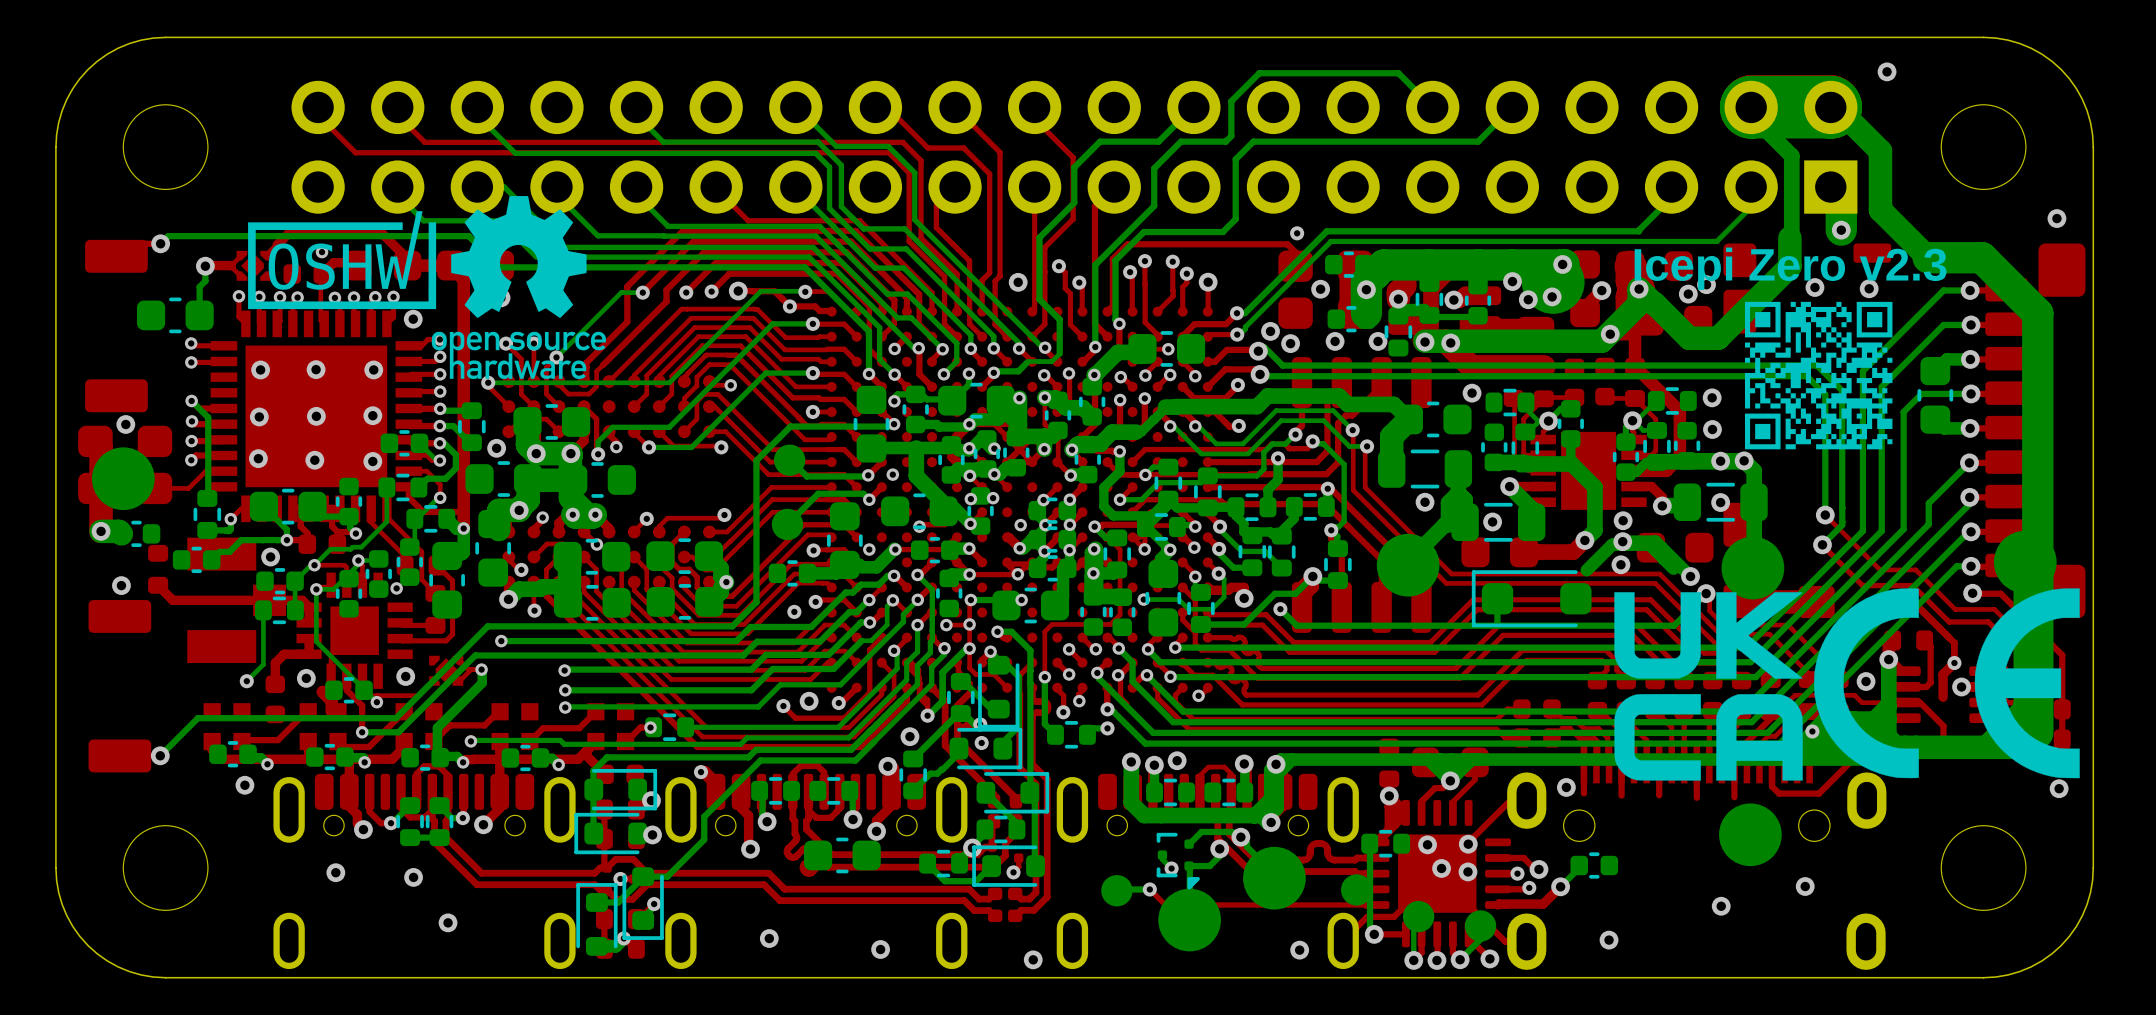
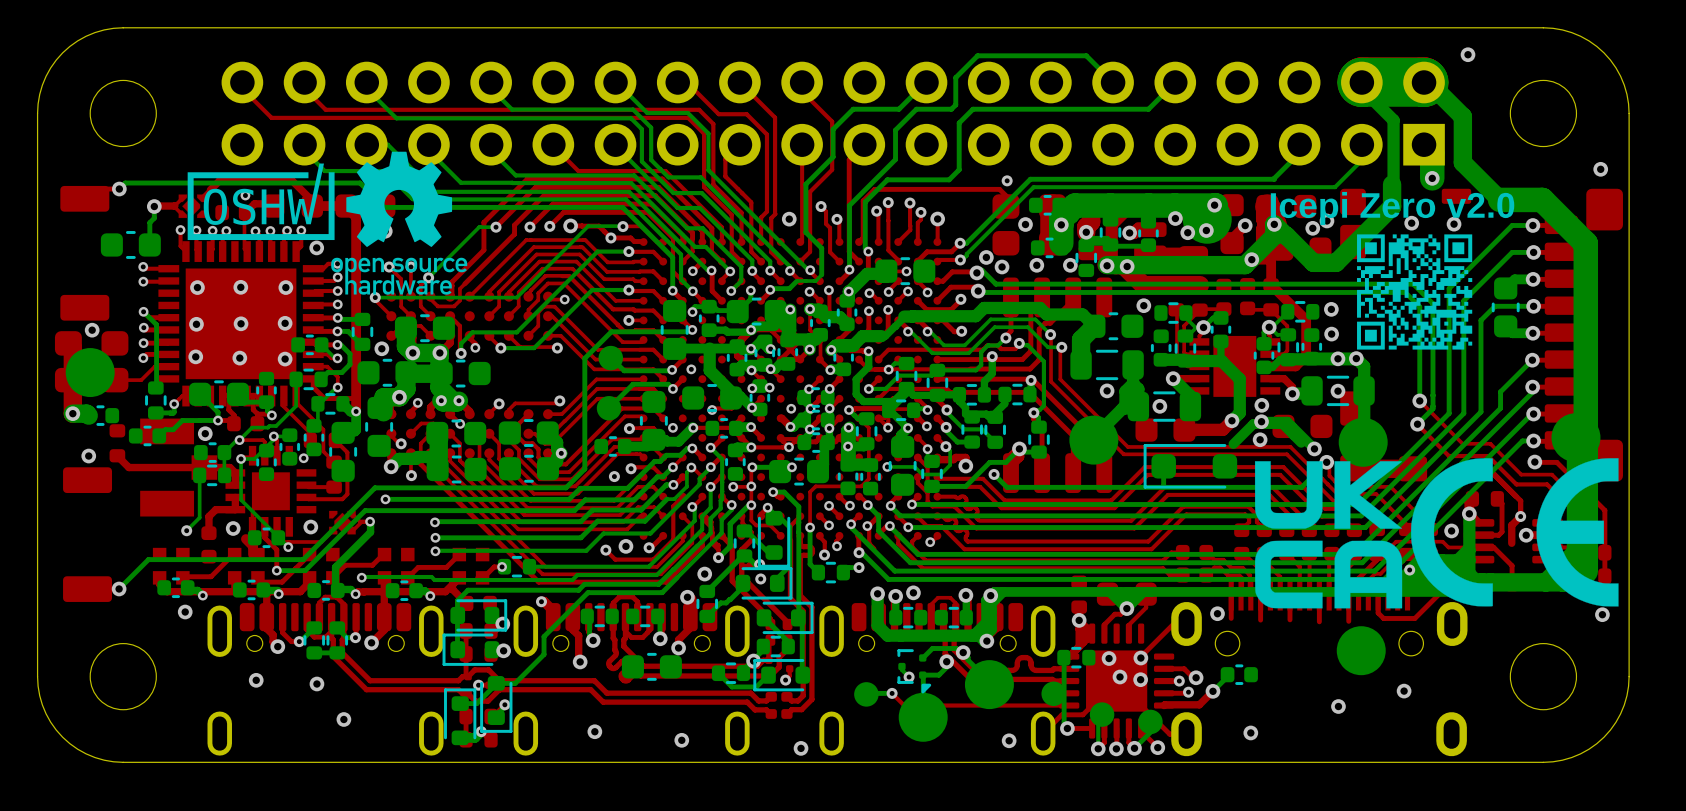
text: Icepi Zero v2.3 (1790, 268) -> Icepi Zero v2.0 (1392, 208)

